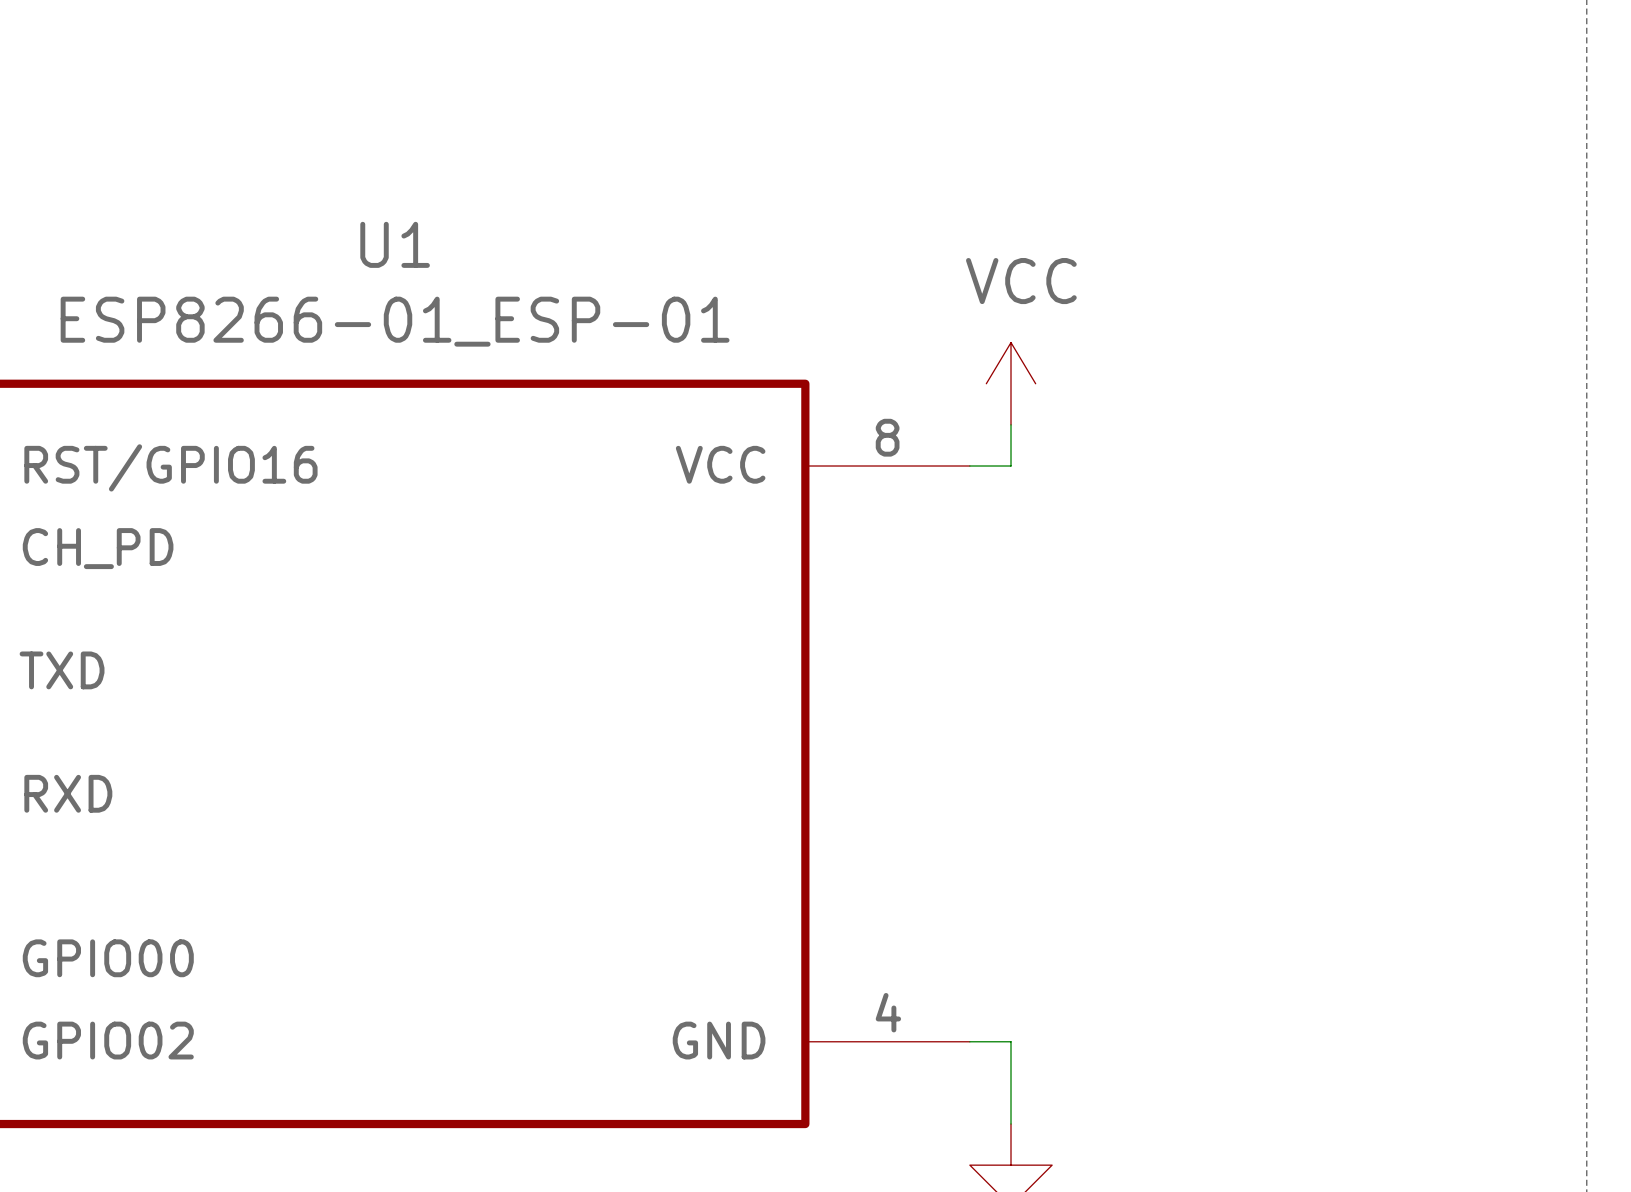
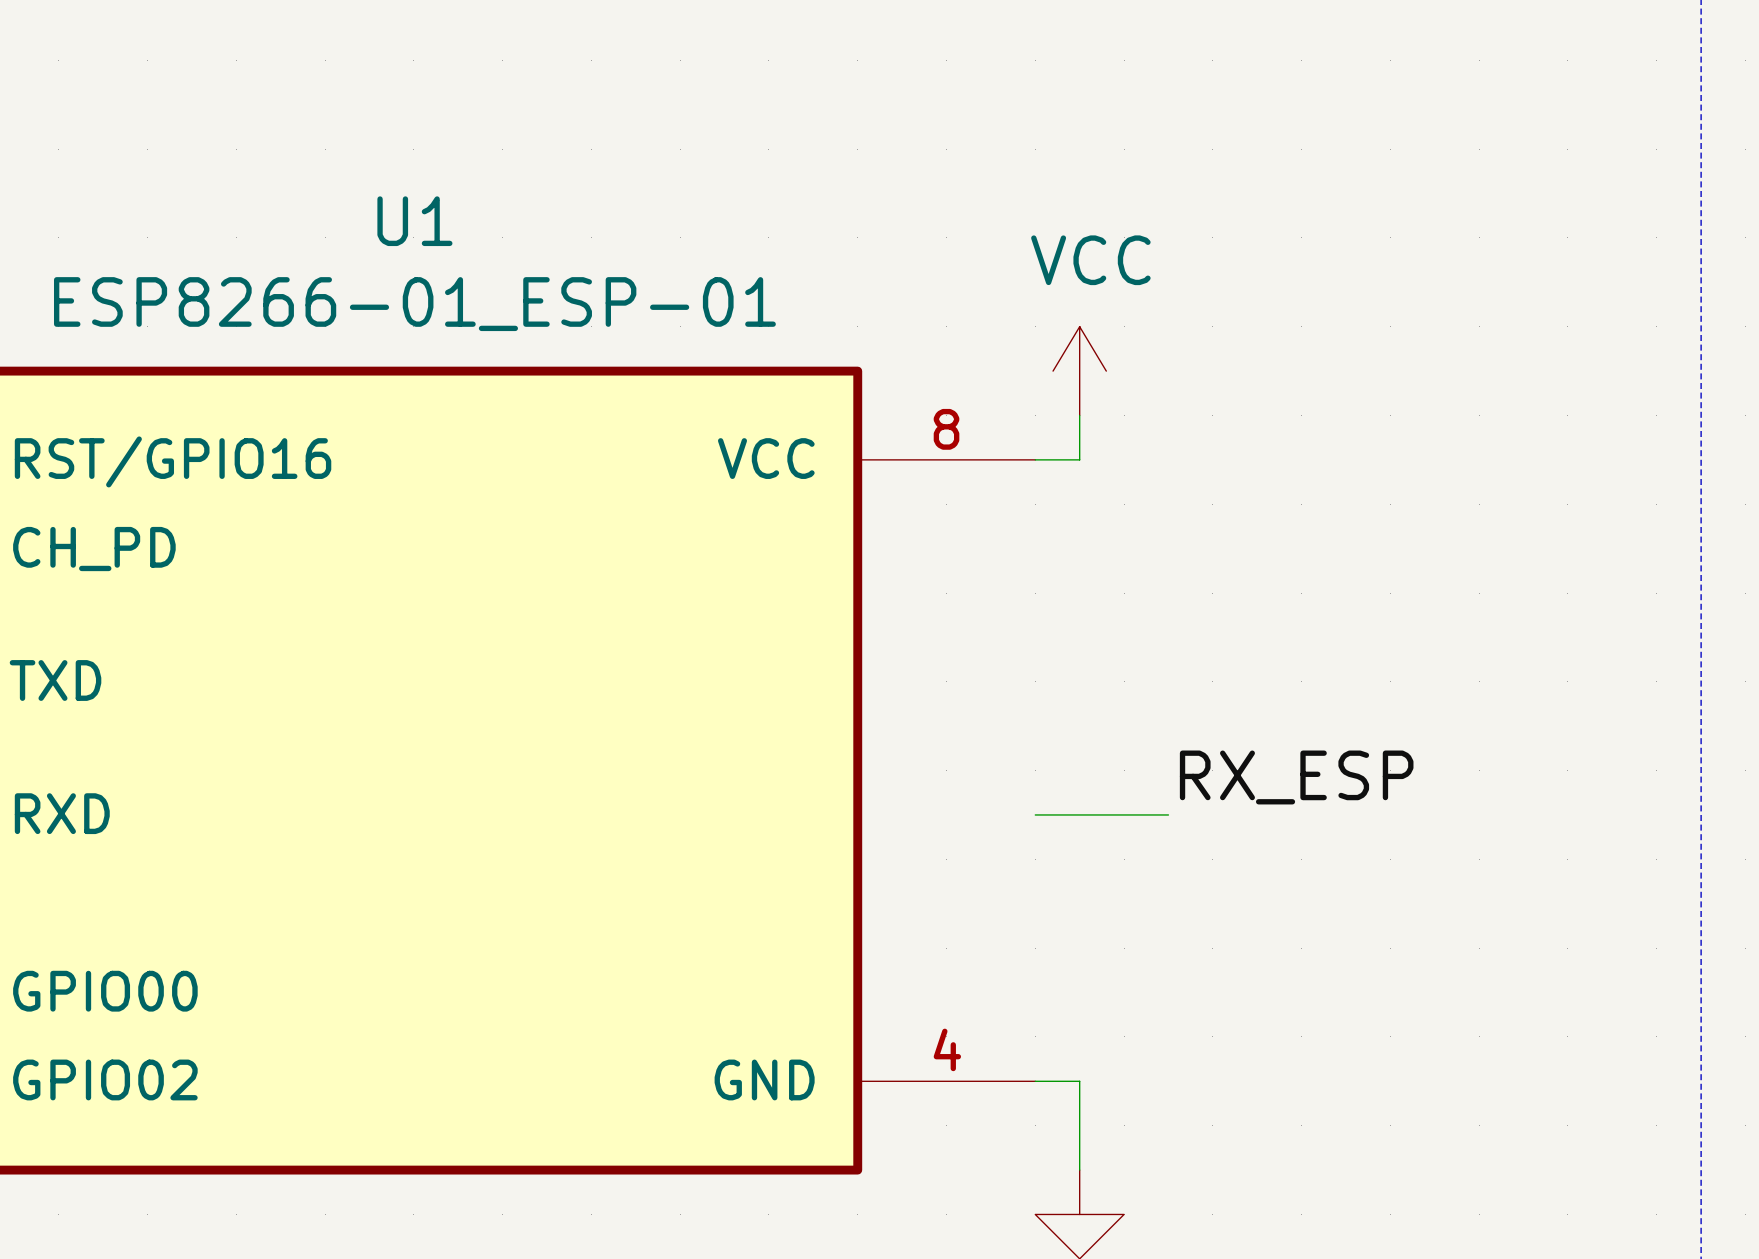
label: none -> RX_ESP (1296, 777)
wire: none -> (1035, 814) (1168, 814)

